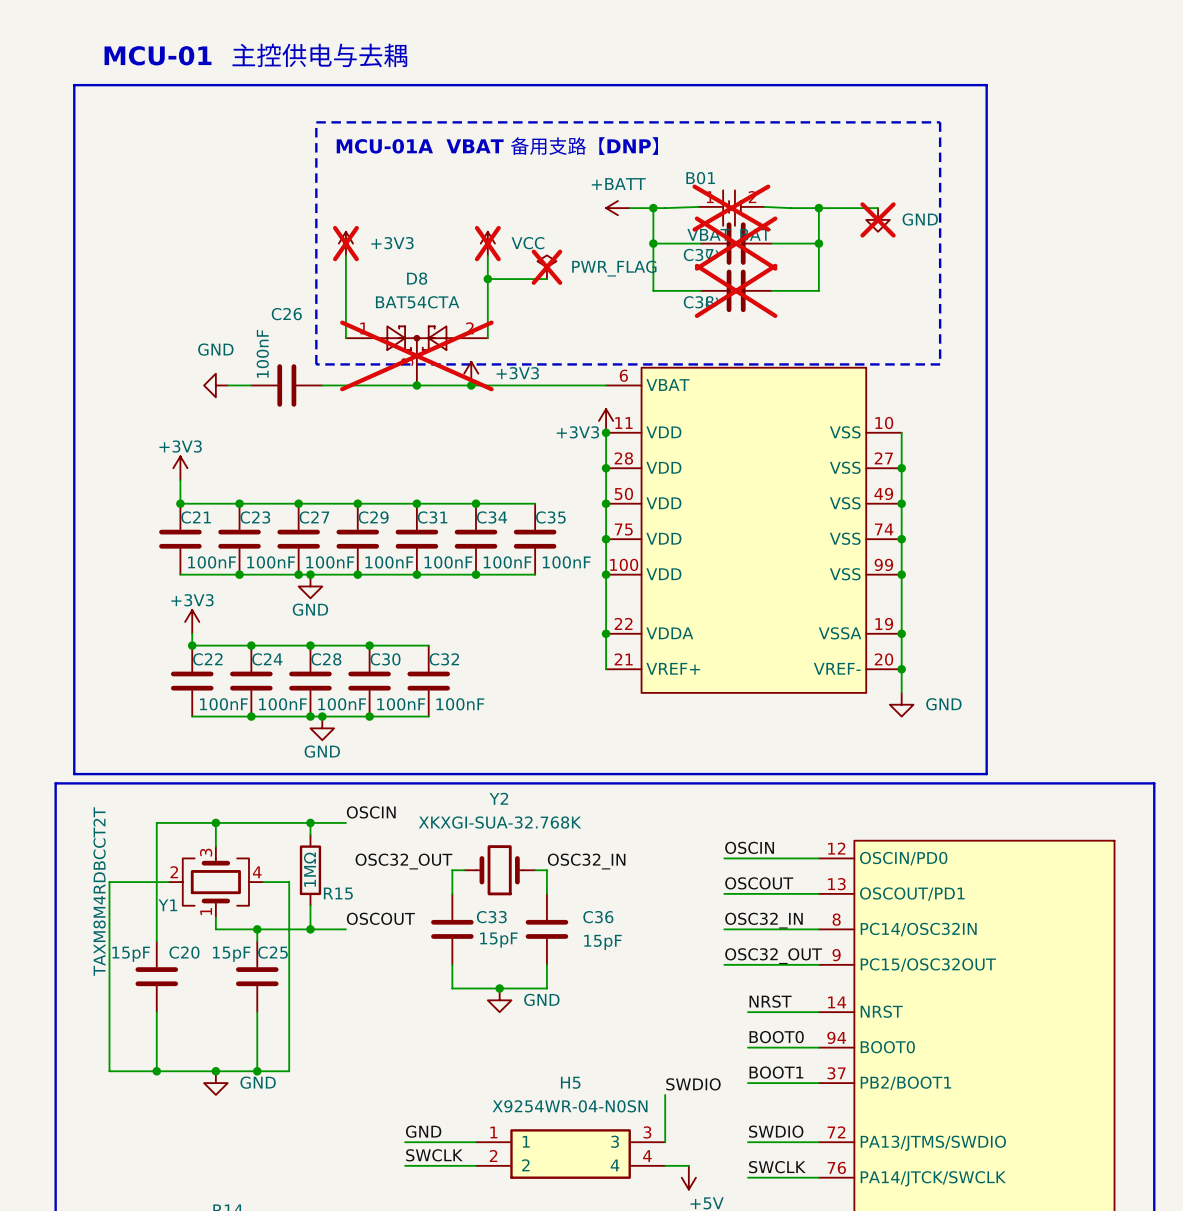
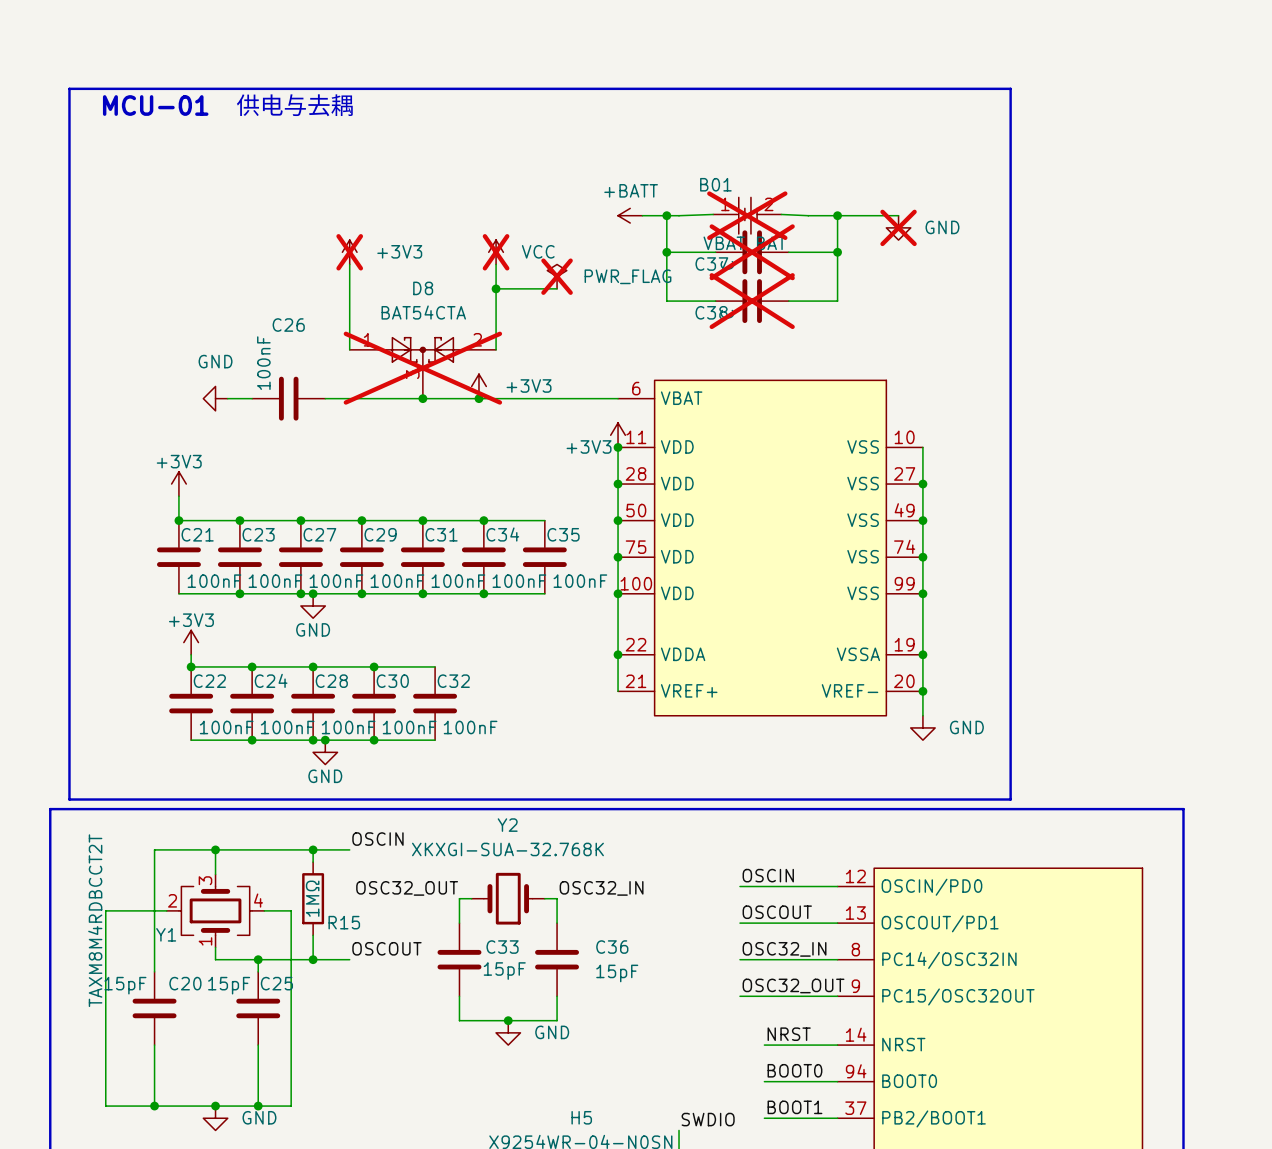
text: MCU-01 主控供电与去耦 (255, 55) -> none
text: none -> MCU-01 供电与去耦 (228, 105)
line: (316, 122) (940, 122) (940, 364) (316, 364) (316, 122) -> none
text: MCU-01A VBAT 备用支路【DNP】 (497, 146) -> none

